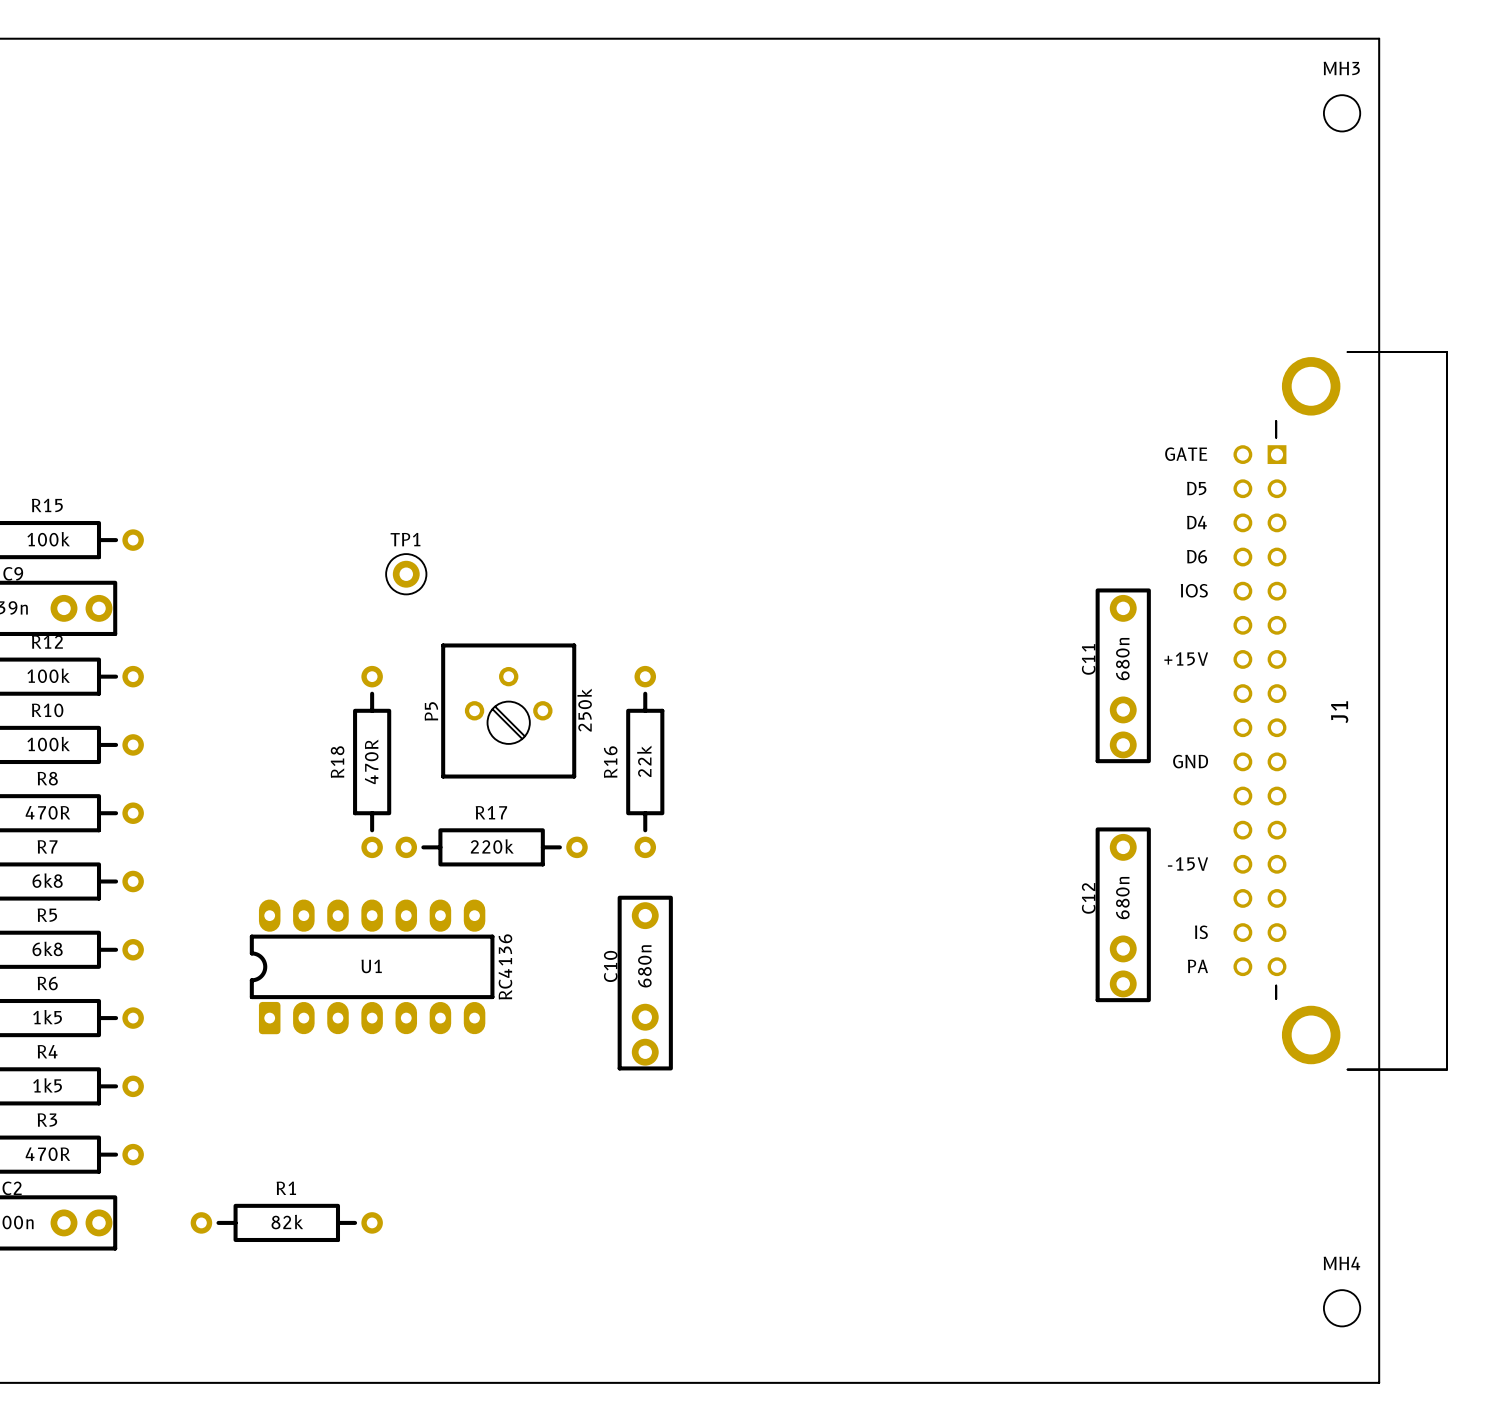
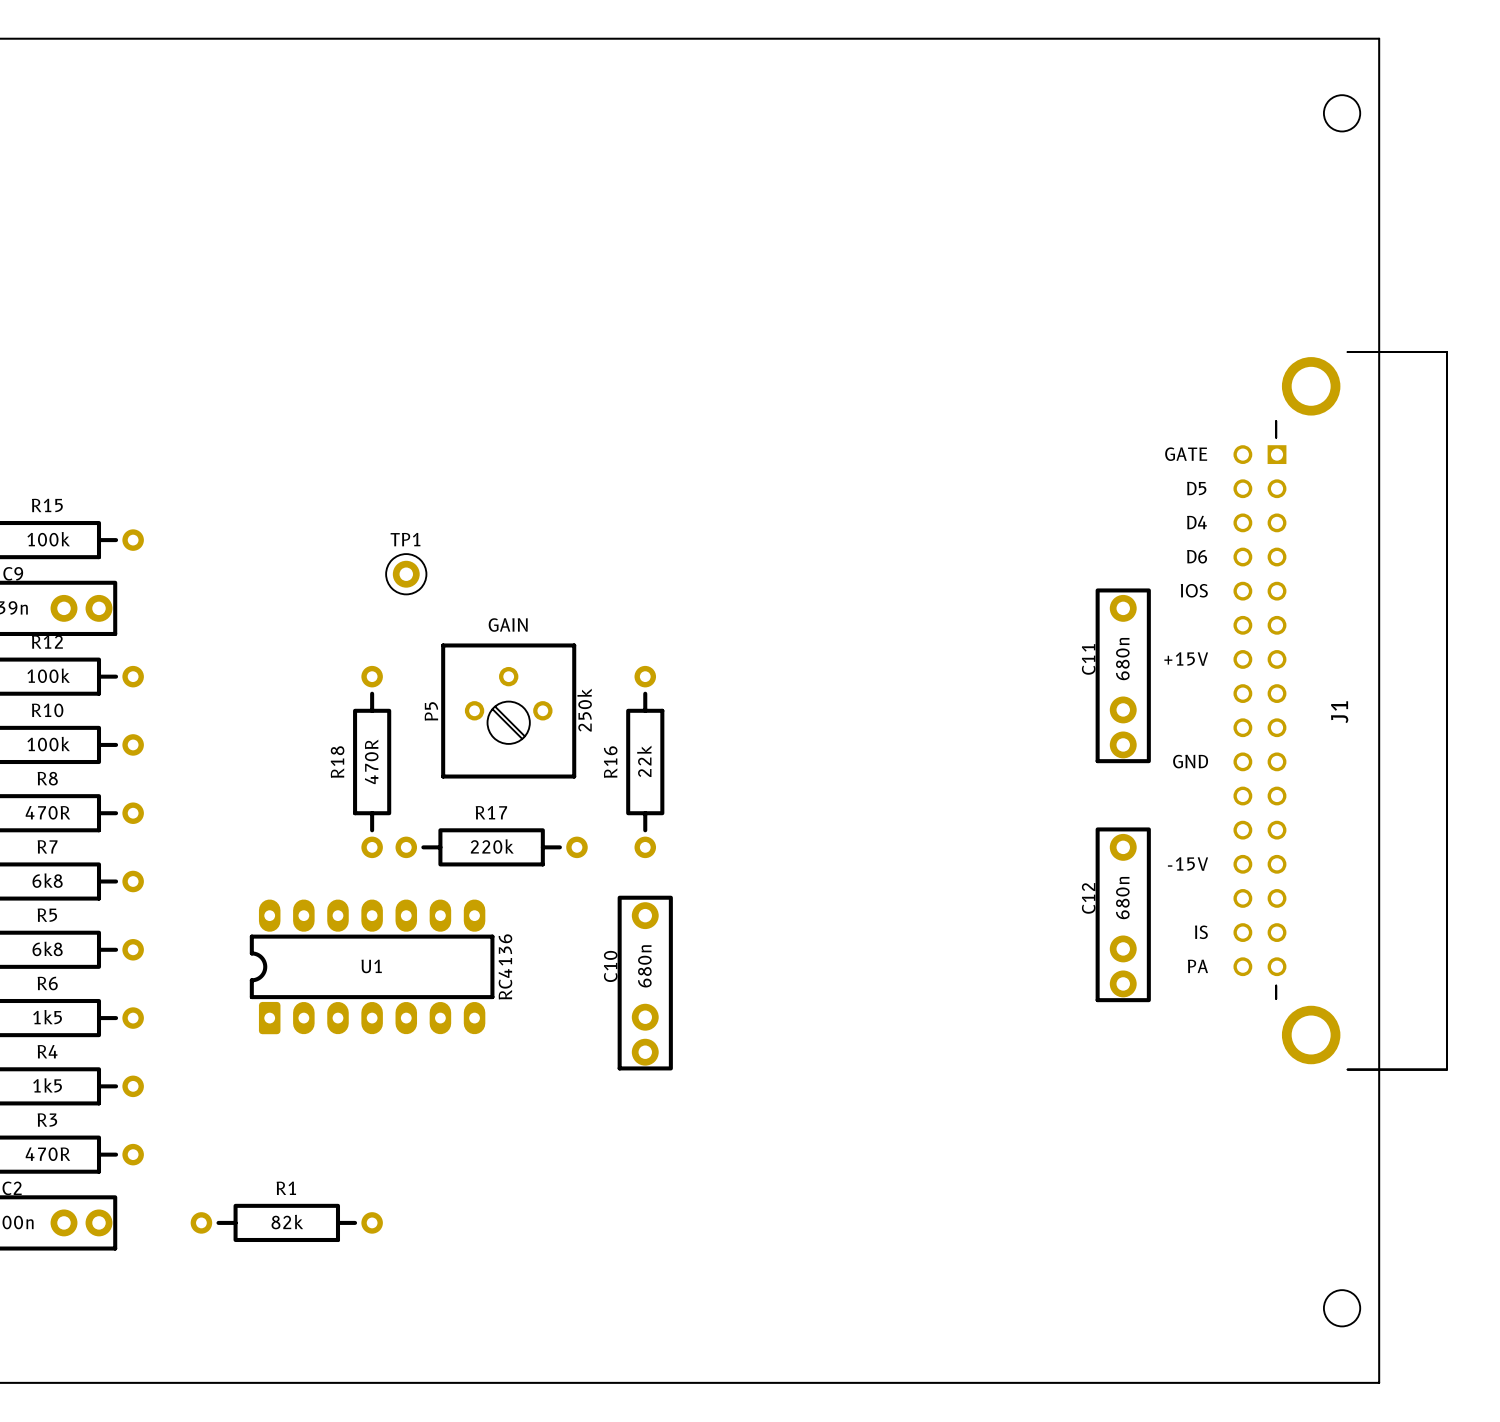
MH3 name: MH3 (1341, 68) -> none
P5 text: none -> GAIN (508, 625)
MH4 name: MH4 (1341, 1263) -> none

